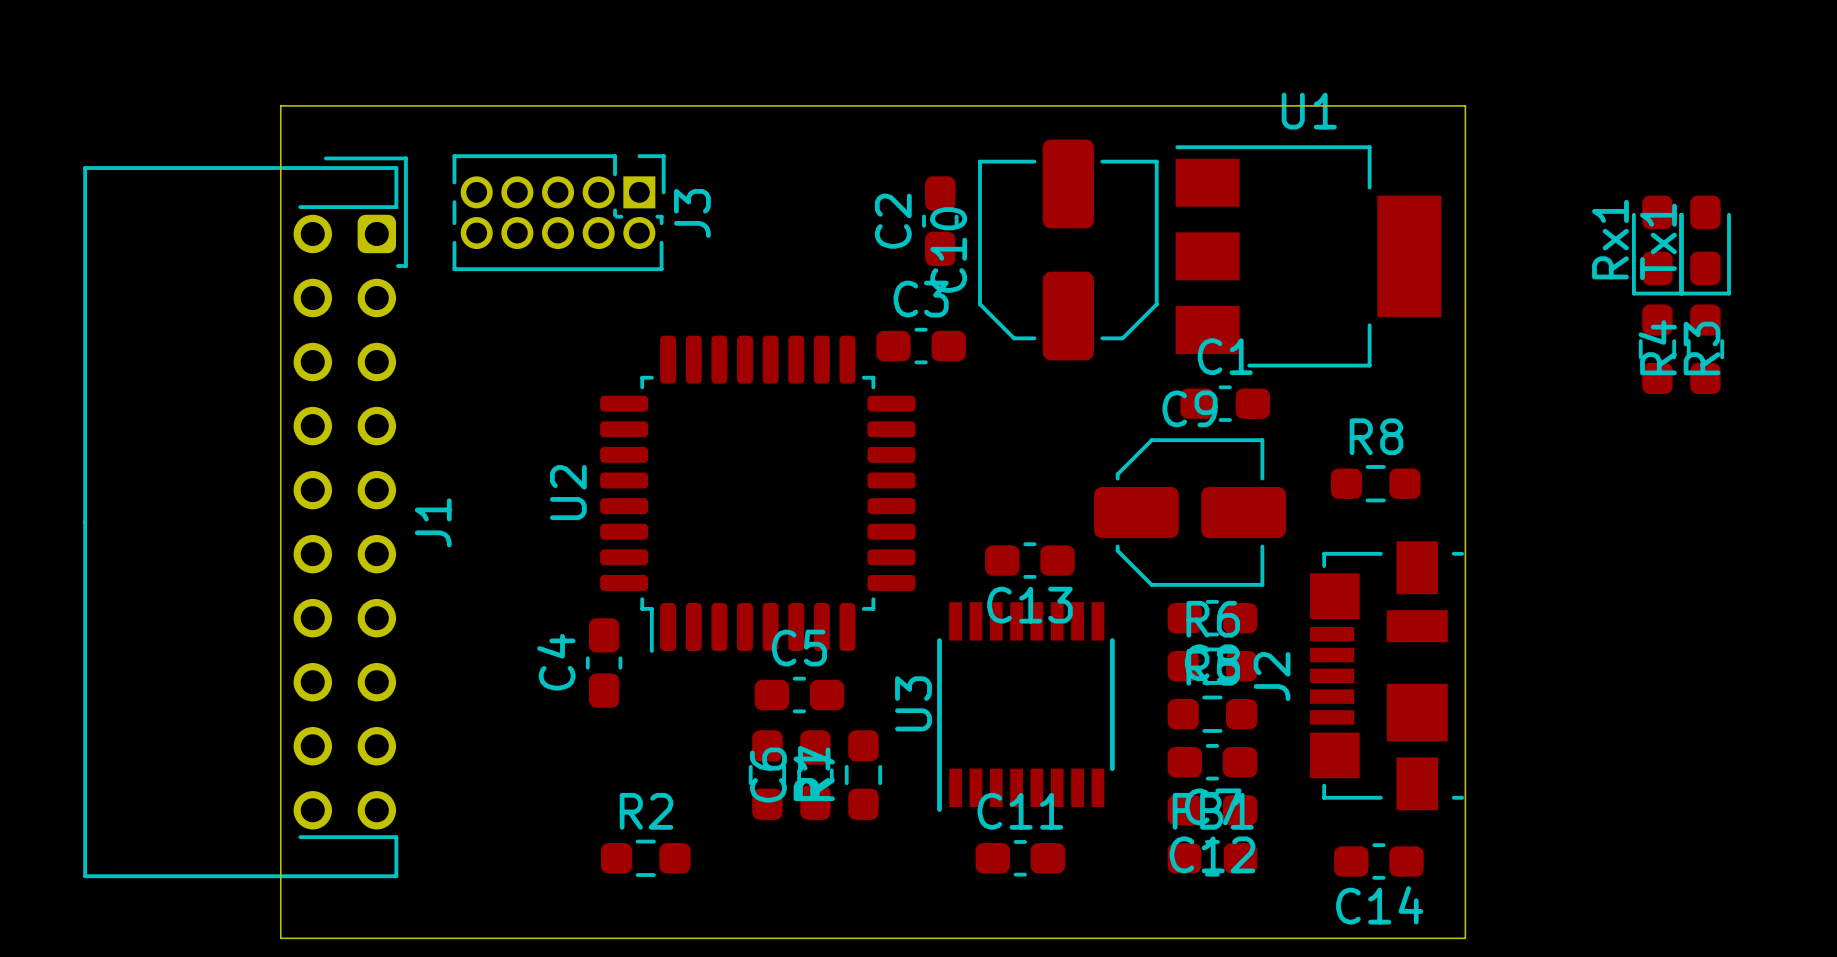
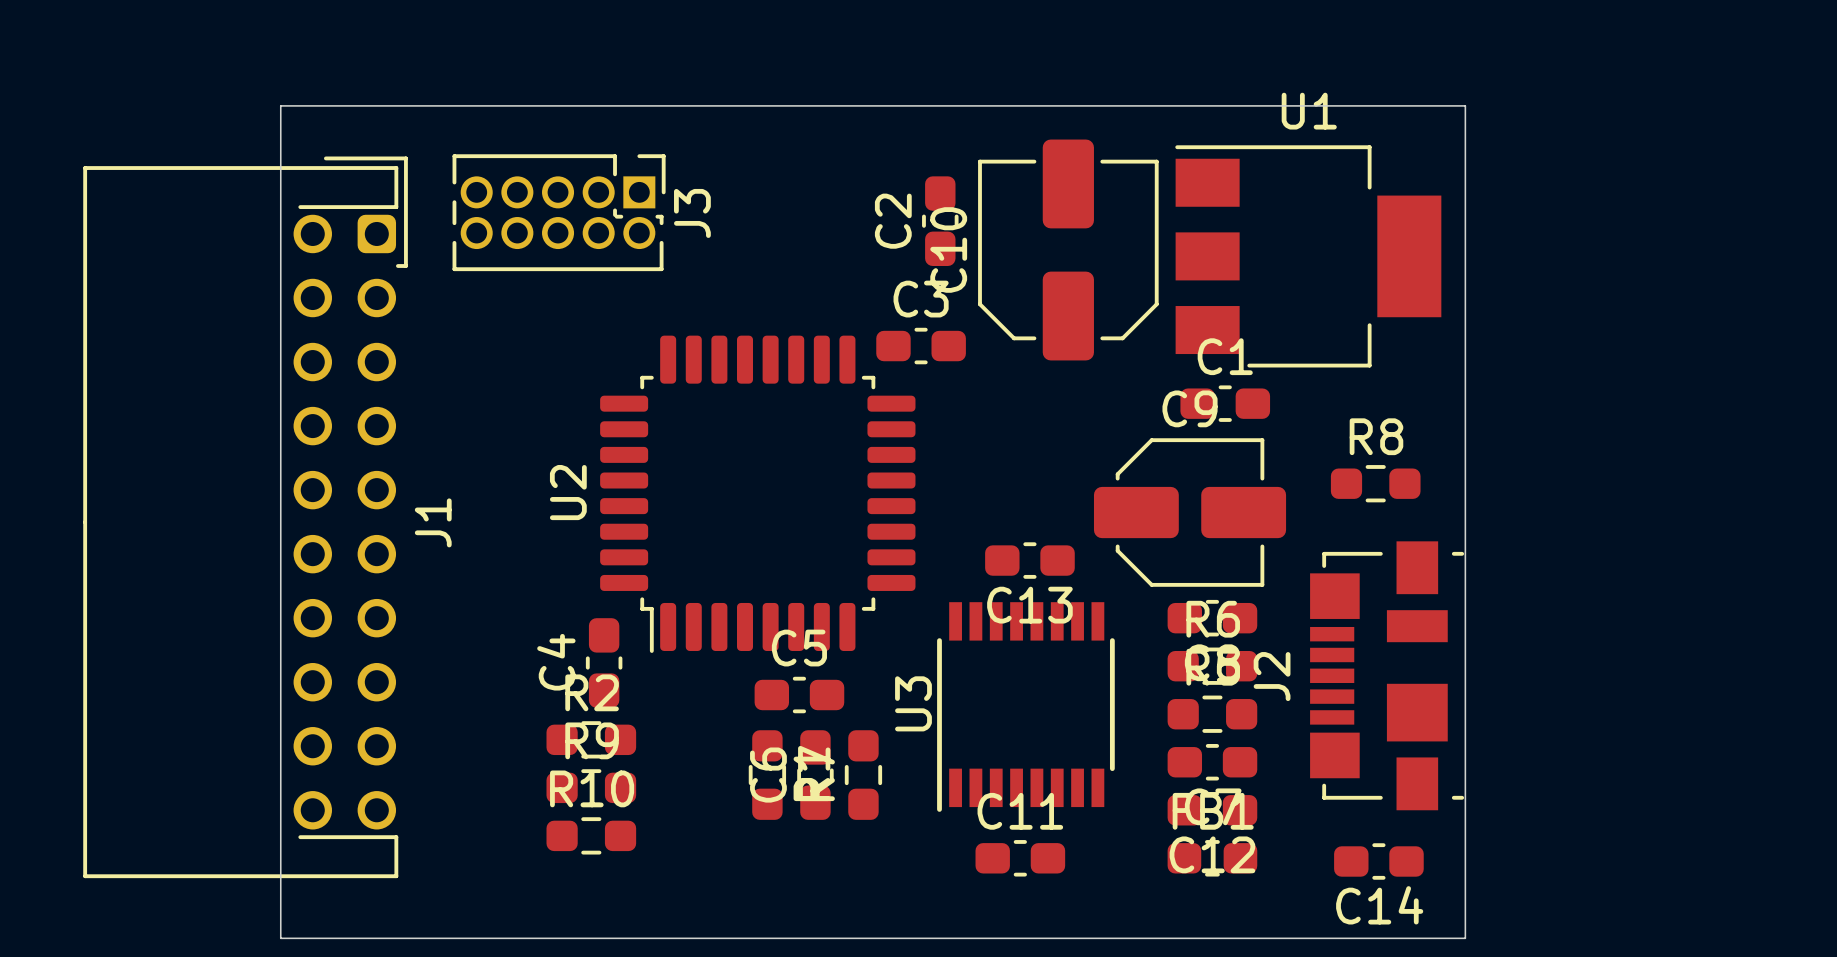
Rx1: (1657, 245) -> none
Tx1: (1705, 245) -> none
R3: (1657, 349) -> none
R4: (1705, 349) -> none
R9: none -> (591, 787)
R10: none -> (591, 835)
R2 position: (645, 858) -> (591, 739)

